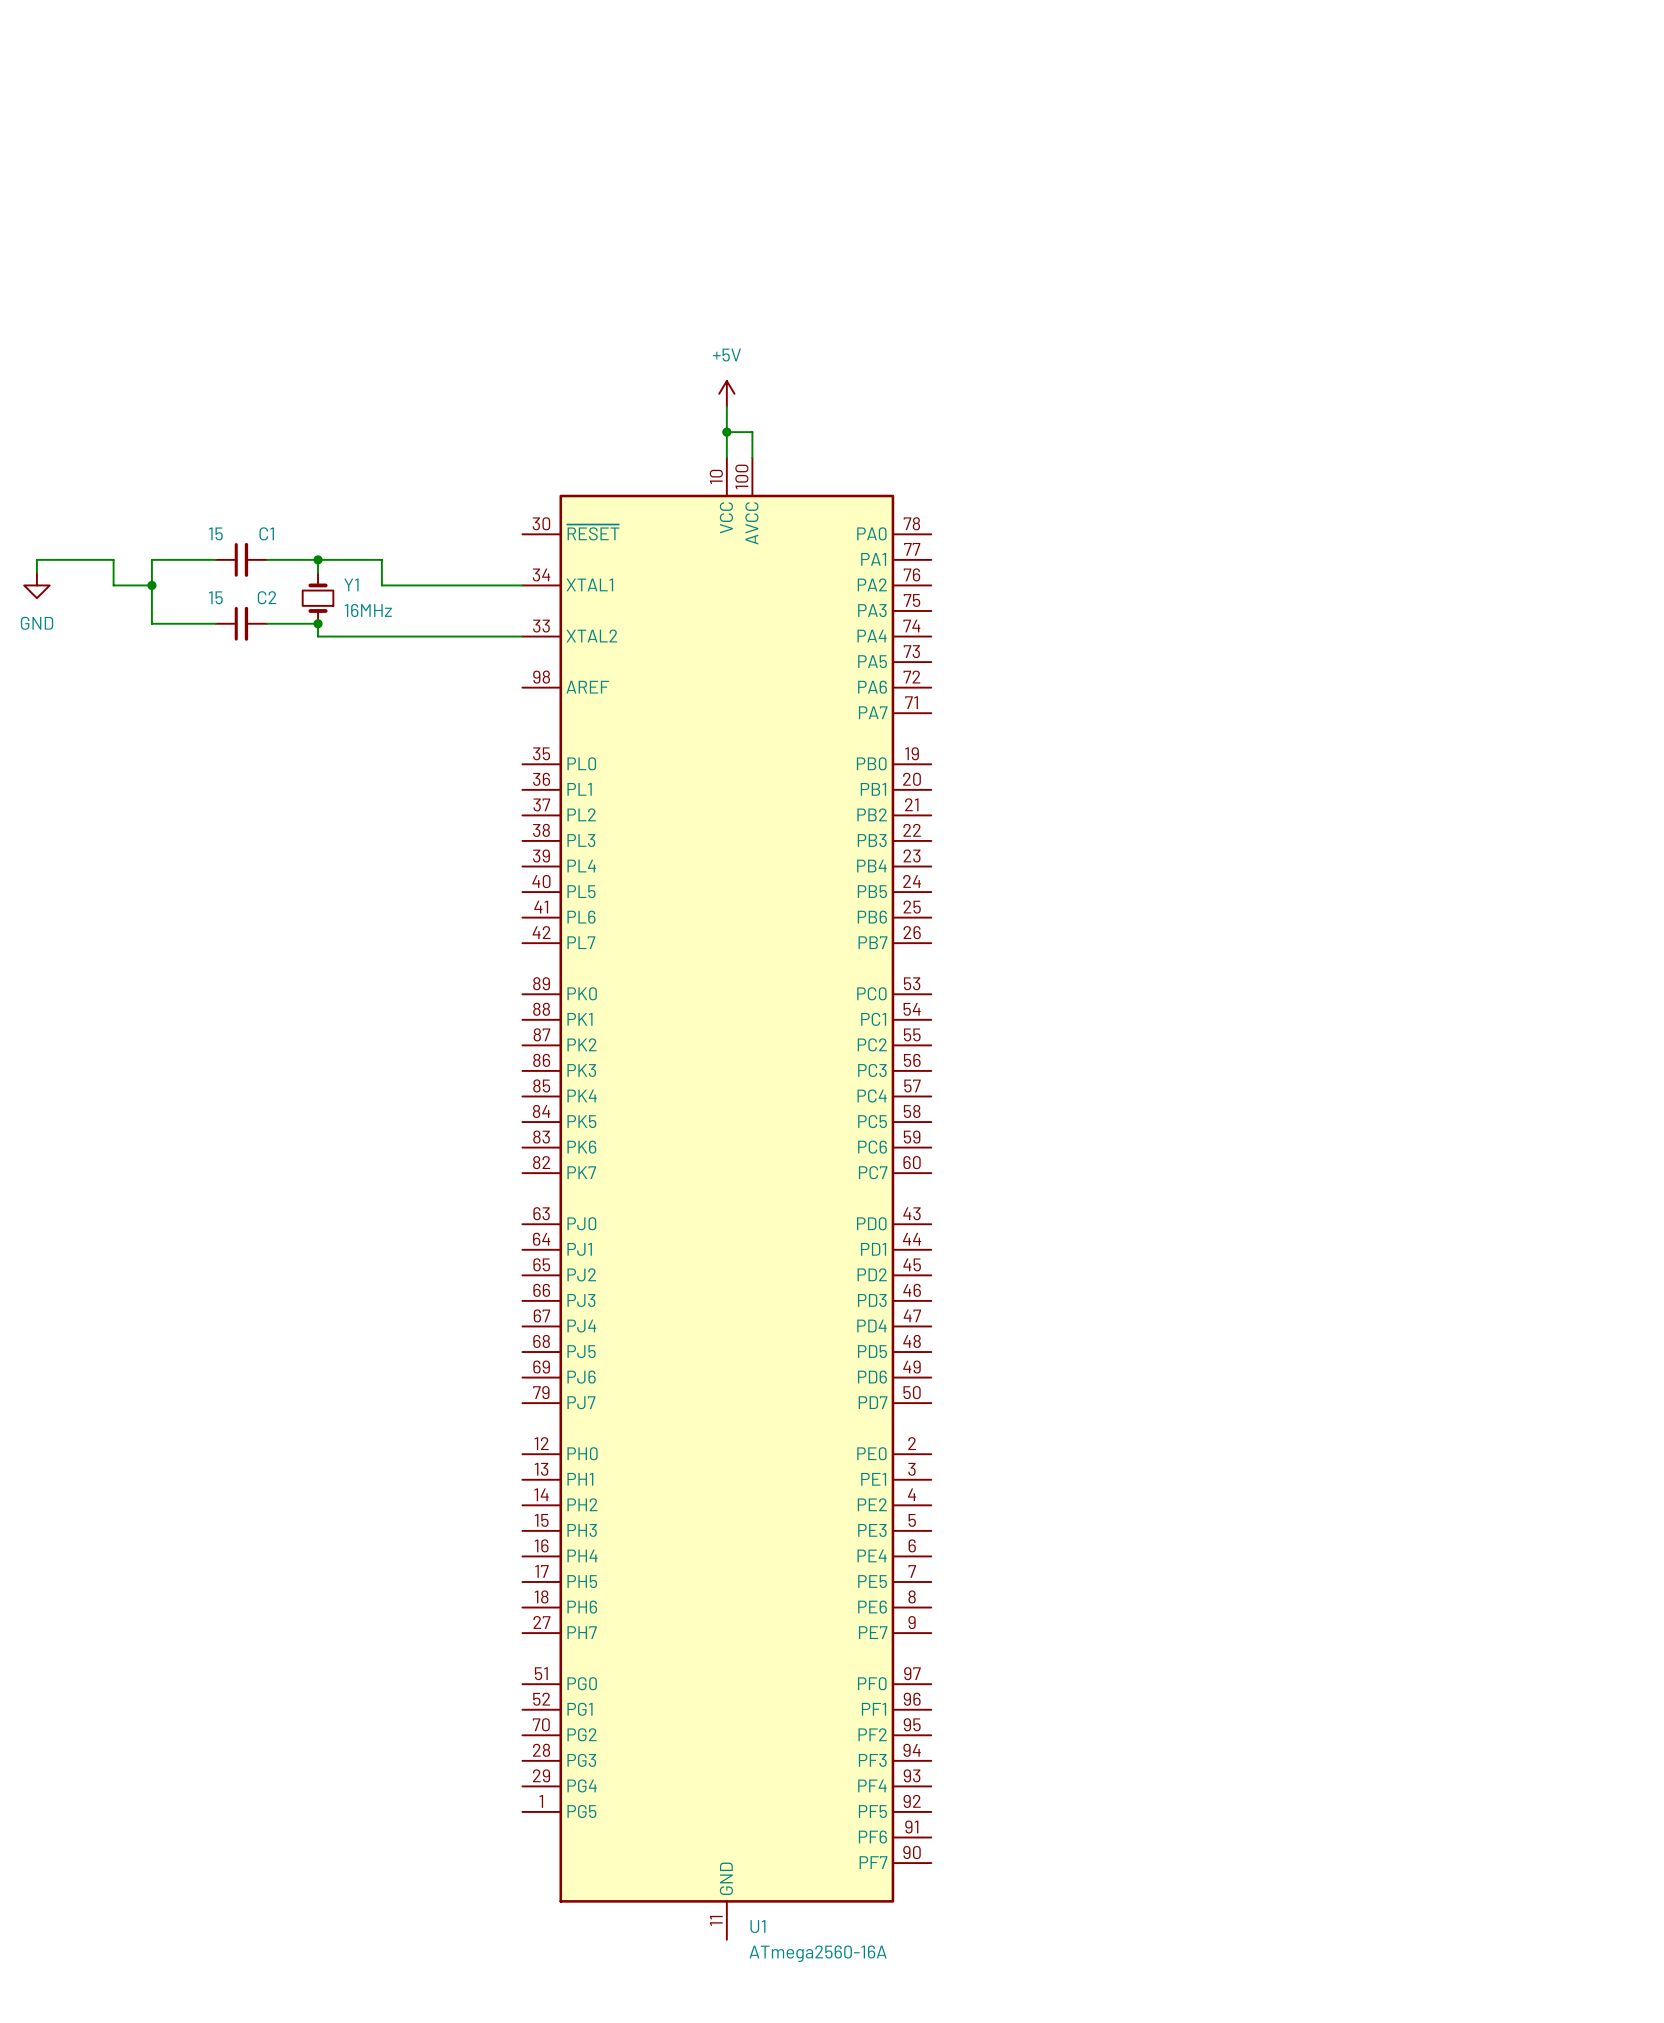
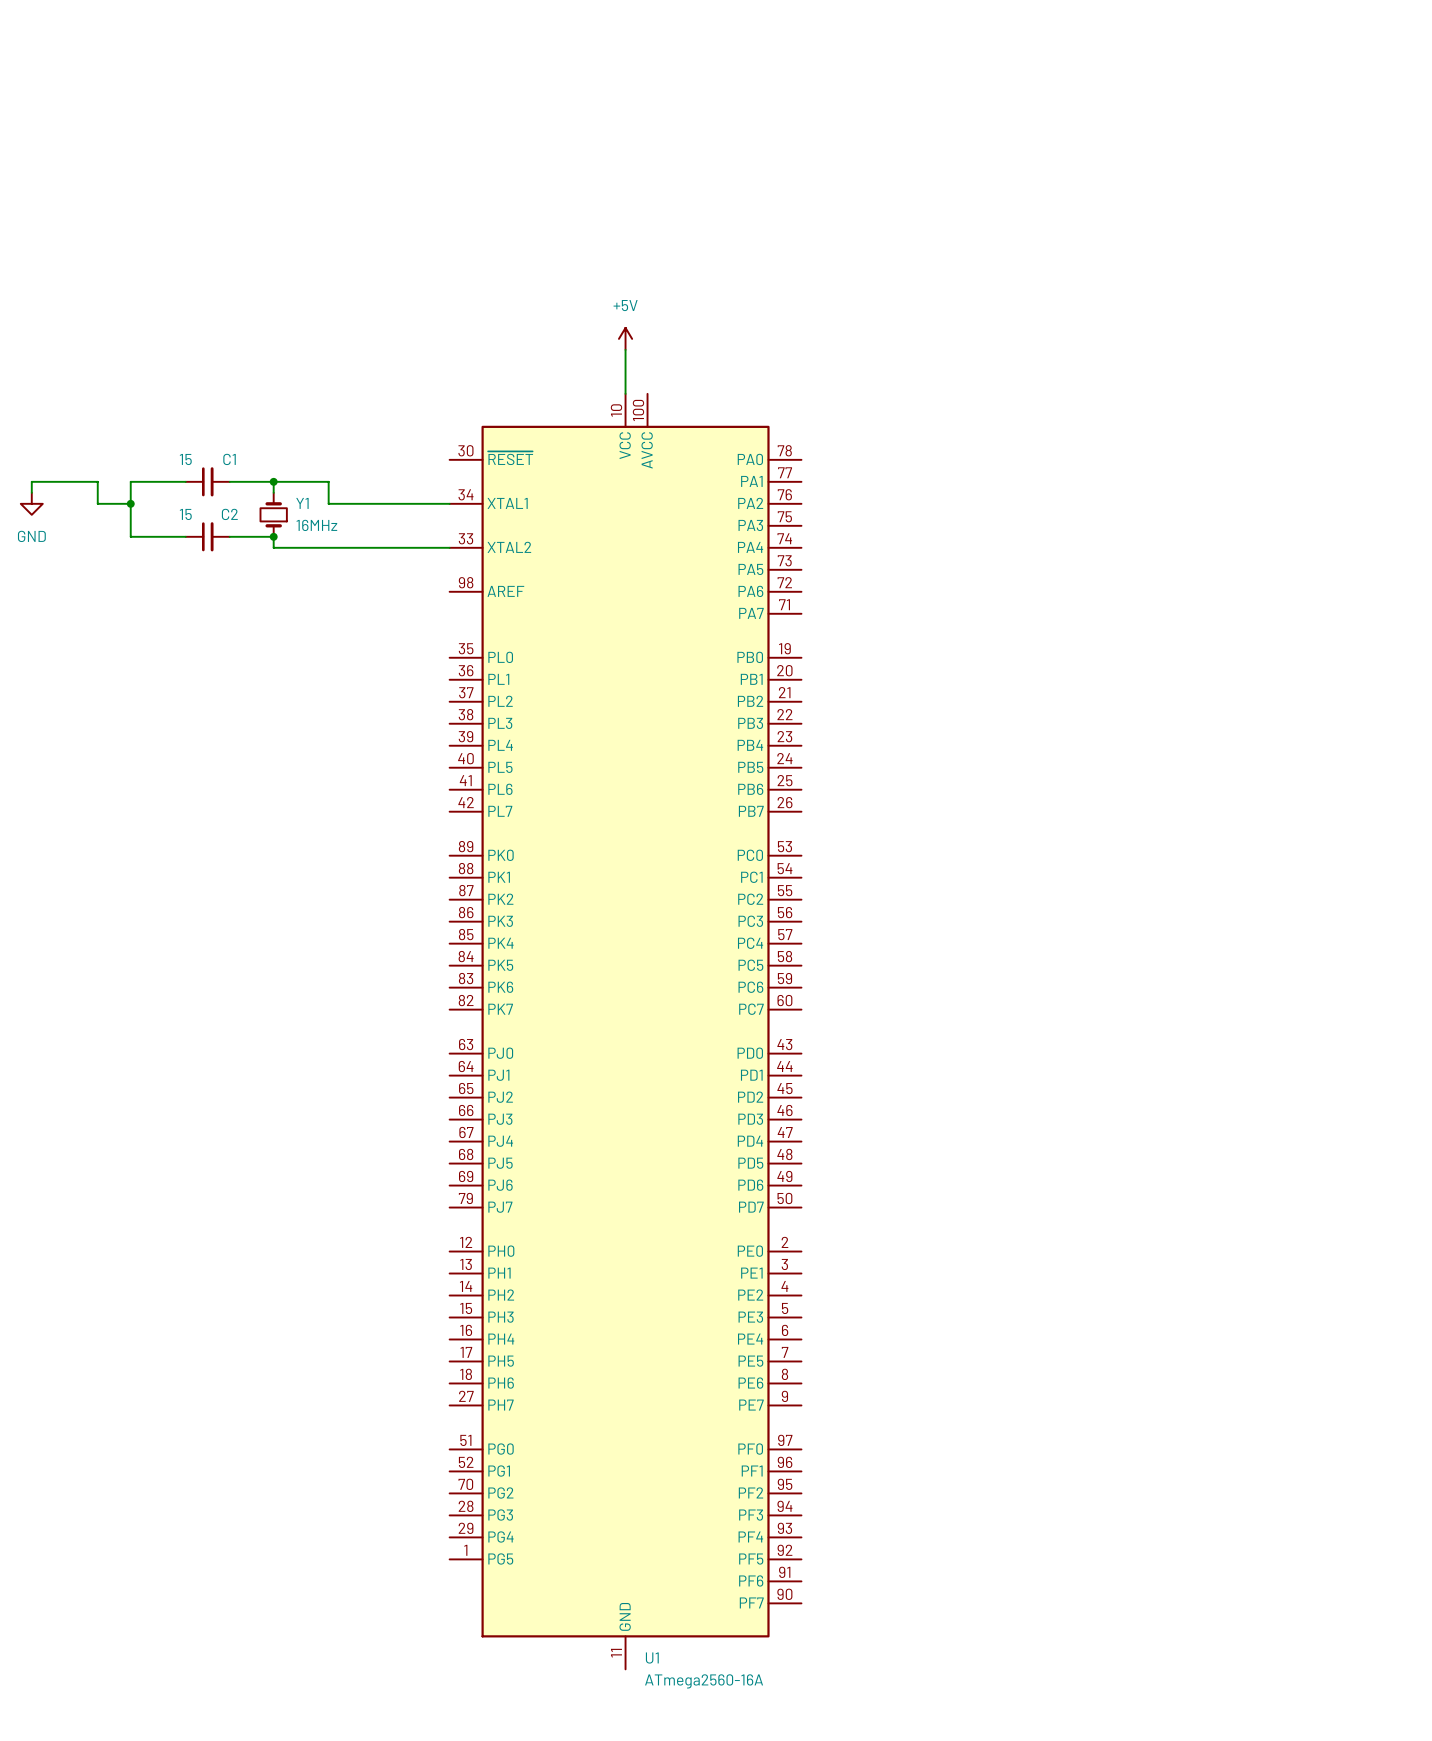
wire: (726, 432) (752, 432) (752, 457) -> none
junction: (726, 432) -> none

